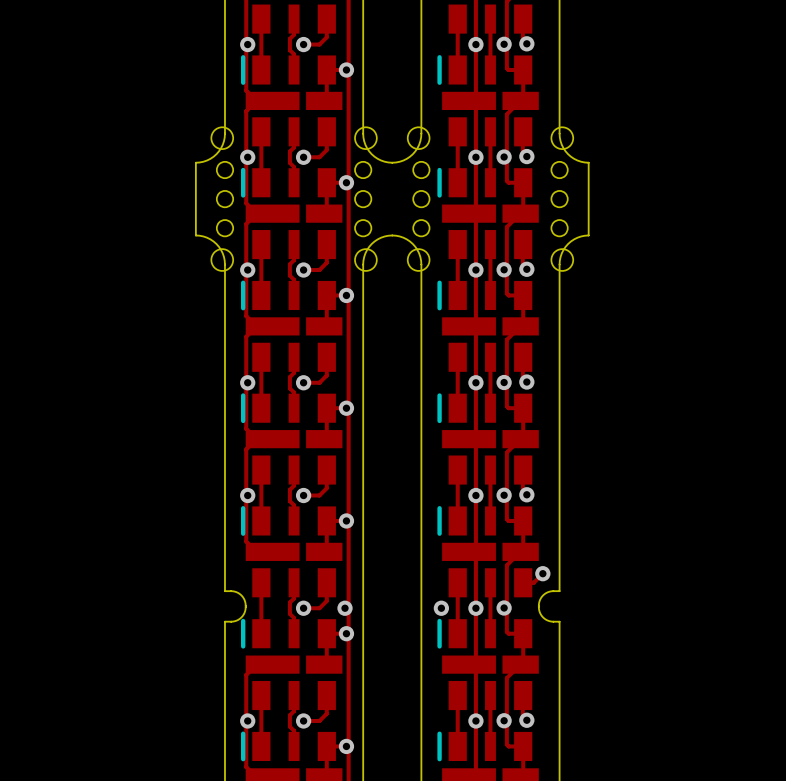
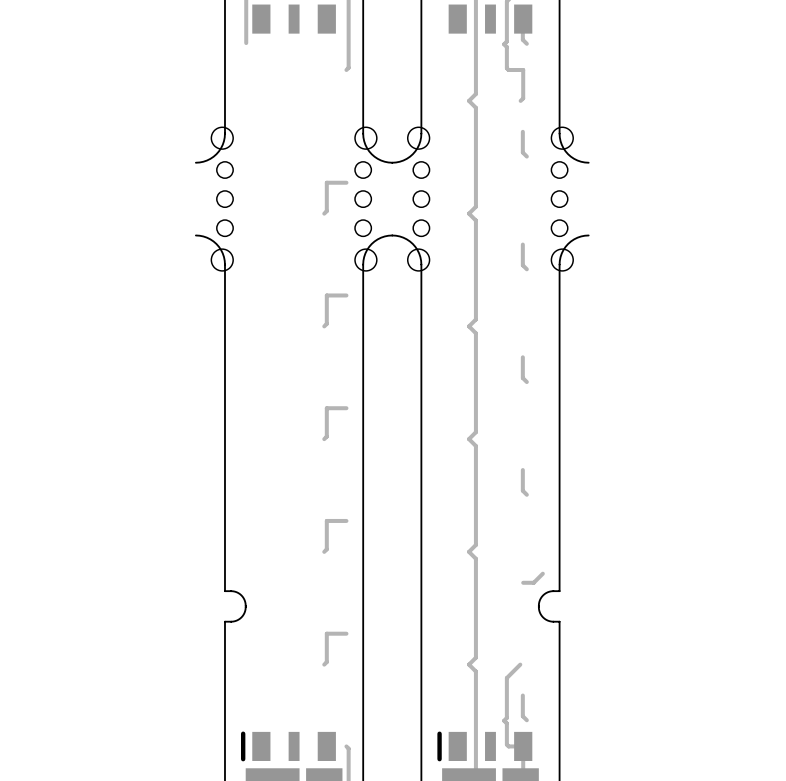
track: (261, 19) (261, 69) -> none
track: (294, 19) (294, 34) (289, 38) (289, 50) (294, 54) (294, 69) -> none
track: (326, 19) (326, 37) (319, 44) (303, 44) -> none
track: (457, 19) (457, 69) -> none
track: (490, 19) (490, 69) -> none
via: (526, 43) -> none
via: (247, 44) -> none
via: (303, 44) -> none
via: (475, 44) -> none
via: (504, 44) -> none
track: (246, 46) (246, 90) (256, 100) -> none
via: (346, 69) -> none
track: (256, 100) (246, 111) (246, 155) -> none
part: (291, 100) -> none
track: (324, 100) (326, 98) (326, 69) (346, 69) (348, 72) (348, 180) (346, 182) (348, 184) (348, 293) (346, 295) (348, 297) (348, 406) (346, 408) (348, 410) (348, 518) (346, 520) (348, 523) (348, 631) (346, 633) (348, 635) (348, 744) (346, 746) (326, 746) (326, 774) (324, 777) -> none
part: (488, 100) -> none
track: (520, 100) (506, 114) (506, 154) (504, 157) (506, 159) (506, 180) (508, 182) (523, 182) (523, 211) (506, 227) (506, 267) (504, 269) (506, 272) (506, 293) (508, 295) (523, 295) (523, 323) (506, 339) (506, 379) (504, 382) (506, 385) (506, 406) (508, 408) (523, 408) (523, 436) (520, 439) -> none
track: (261, 131) (261, 182) -> none
track: (294, 131) (294, 147) (289, 151) (289, 162) (294, 167) (294, 182) -> none
track: (326, 131) (326, 150) (319, 157) (303, 157) -> none
track: (457, 132) (457, 182) -> none
track: (490, 132) (490, 182) -> none
via: (526, 156) -> none
via: (247, 157) -> none
via: (303, 157) -> none
via: (475, 157) -> none
via: (504, 157) -> none
track: (246, 158) (246, 203) (256, 213) -> none
board edge: (195, 162) (195, 235) -> none
board edge: (588, 162) (588, 235) -> none
via: (346, 182) -> none
track: (256, 213) (246, 223) (246, 268) -> none
part: (291, 213) -> none
part: (488, 213) -> none
track: (261, 244) (261, 295) -> none
track: (294, 244) (294, 260) (289, 264) (289, 275) (294, 279) (294, 295) -> none
track: (326, 244) (326, 262) (319, 270) (303, 270) -> none
track: (457, 244) (457, 295) -> none
track: (490, 244) (490, 295) -> none
via: (504, 269) -> none
via: (526, 269) -> none
via: (247, 270) -> none
via: (303, 270) -> none
via: (475, 270) -> none
track: (246, 271) (246, 316) (256, 326) -> none
via: (346, 295) -> none
track: (256, 326) (246, 336) (246, 381) -> none
part: (291, 326) -> none
part: (488, 326) -> none
track: (261, 357) (261, 408) -> none
track: (294, 357) (294, 372) (289, 377) (289, 388) (294, 392) (294, 408) -> none
track: (326, 357) (326, 375) (319, 382) (303, 382) -> none
track: (457, 357) (457, 408) -> none
track: (490, 357) (490, 408) -> none
via: (247, 382) -> none
via: (303, 382) -> none
via: (475, 382) -> none
via: (504, 382) -> none
via: (526, 382) -> none
track: (246, 384) (246, 428) (256, 439) -> none
via: (346, 408) -> none
part: (291, 438) -> none
part: (488, 438) -> none
track: (256, 439) (246, 449) (246, 494) -> none
track: (520, 439) (506, 452) (506, 492) (504, 495) (506, 498) (506, 519) (508, 520) (523, 520) (523, 549) (520, 551) -> none
track: (261, 470) (261, 520) -> none
track: (294, 470) (294, 485) (289, 489) (289, 501) (294, 505) (294, 520) -> none
track: (326, 470) (326, 488) (319, 495) (303, 495) -> none
track: (457, 470) (457, 520) -> none
track: (490, 470) (490, 520) -> none
via: (526, 494) -> none
via: (247, 495) -> none
via: (303, 495) -> none
via: (475, 495) -> none
via: (504, 495) -> none
track: (246, 496) (246, 541) (256, 551) (272, 551) -> none
via: (346, 520) -> none
part: (291, 551) -> none
part: (488, 551) -> none
track: (520, 551) (506, 565) (506, 605) (504, 608) (506, 610) (506, 631) (508, 633) (523, 633) (523, 662) (520, 664) -> none
via: (542, 573) -> none
track: (261, 582) (261, 633) -> none
track: (294, 582) (294, 598) (289, 602) (289, 613) (294, 618) (294, 633) -> none
track: (326, 582) (326, 600) (319, 608) (303, 608) -> none
track: (457, 583) (457, 633) -> none
track: (490, 583) (490, 633) -> none
via: (303, 608) -> none
via: (345, 608) -> none
via: (441, 608) -> none
via: (475, 608) -> none
via: (504, 608) -> none
via: (346, 633) -> none
track: (272, 664) (256, 664) (246, 674) (246, 719) -> none
part: (291, 664) -> none
part: (488, 664) -> none
track: (261, 695) (261, 746) -> none
track: (294, 695) (294, 711) (289, 715) (289, 726) (294, 730) (294, 746) -> none
track: (326, 695) (326, 713) (319, 720) (303, 720) -> none
track: (457, 695) (457, 746) -> none
track: (490, 695) (490, 746) -> none
via: (247, 720) -> none
via: (303, 720) -> none
via: (475, 720) -> none
via: (504, 720) -> none
via: (526, 720) -> none
track: (246, 722) (246, 767) (256, 777) (272, 777) -> none
via: (346, 746) -> none

